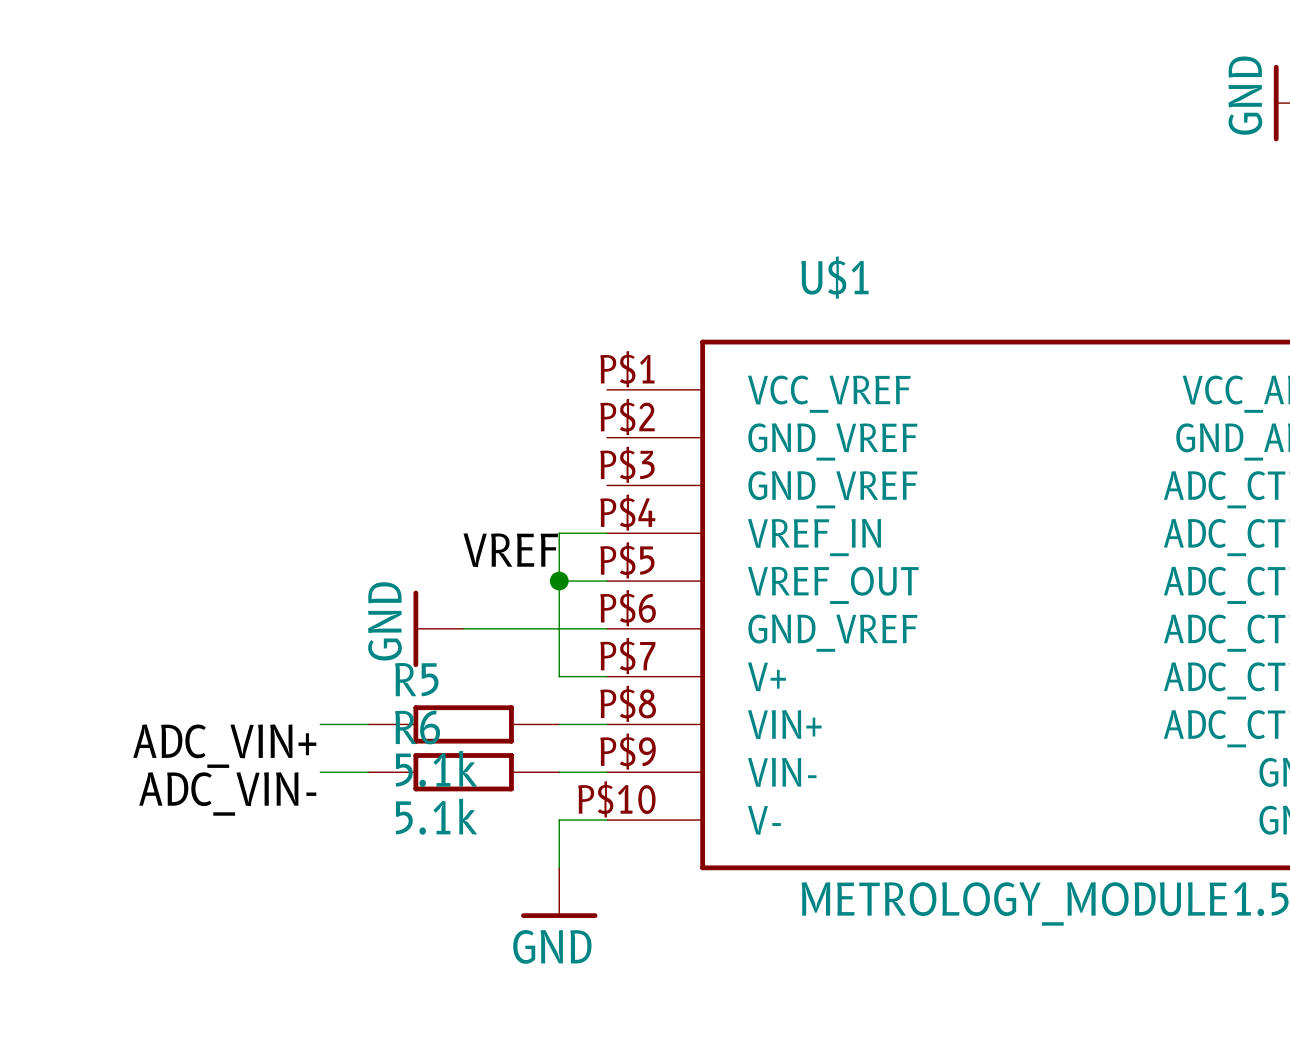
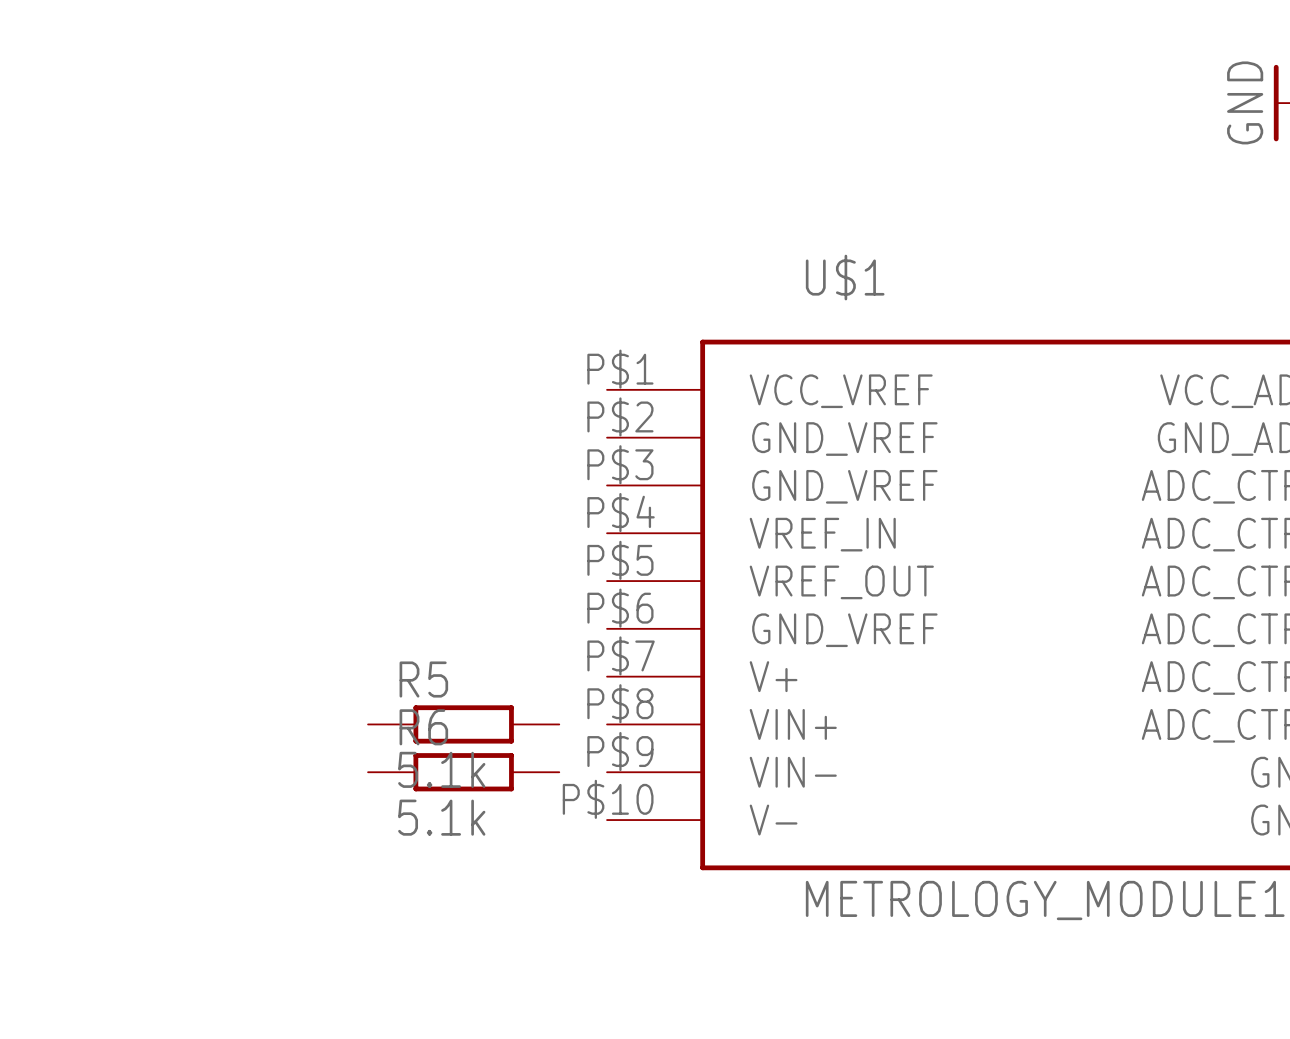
wire: (607, 533) (559, 533) (559, 676) (607, 676) -> none
label: VREF (510, 550) -> none
wire: (559, 581) (607, 581) -> none
junction: (559, 581) -> none
power symbol: GND (438, 628) -> none
wire: (463, 628) (607, 628) -> none
wire: (320, 724) (368, 724) -> none
wire: (559, 724) (607, 724) -> none
label: ADC_VIN+ (224, 746) -> none
wire: (320, 772) (368, 772) -> none
wire: (559, 772) (607, 772) -> none
label: ADC_VIN- (227, 793) -> none
wire: (607, 820) (559, 820) (559, 867) -> none
power symbol: GND (559, 892) -> none

